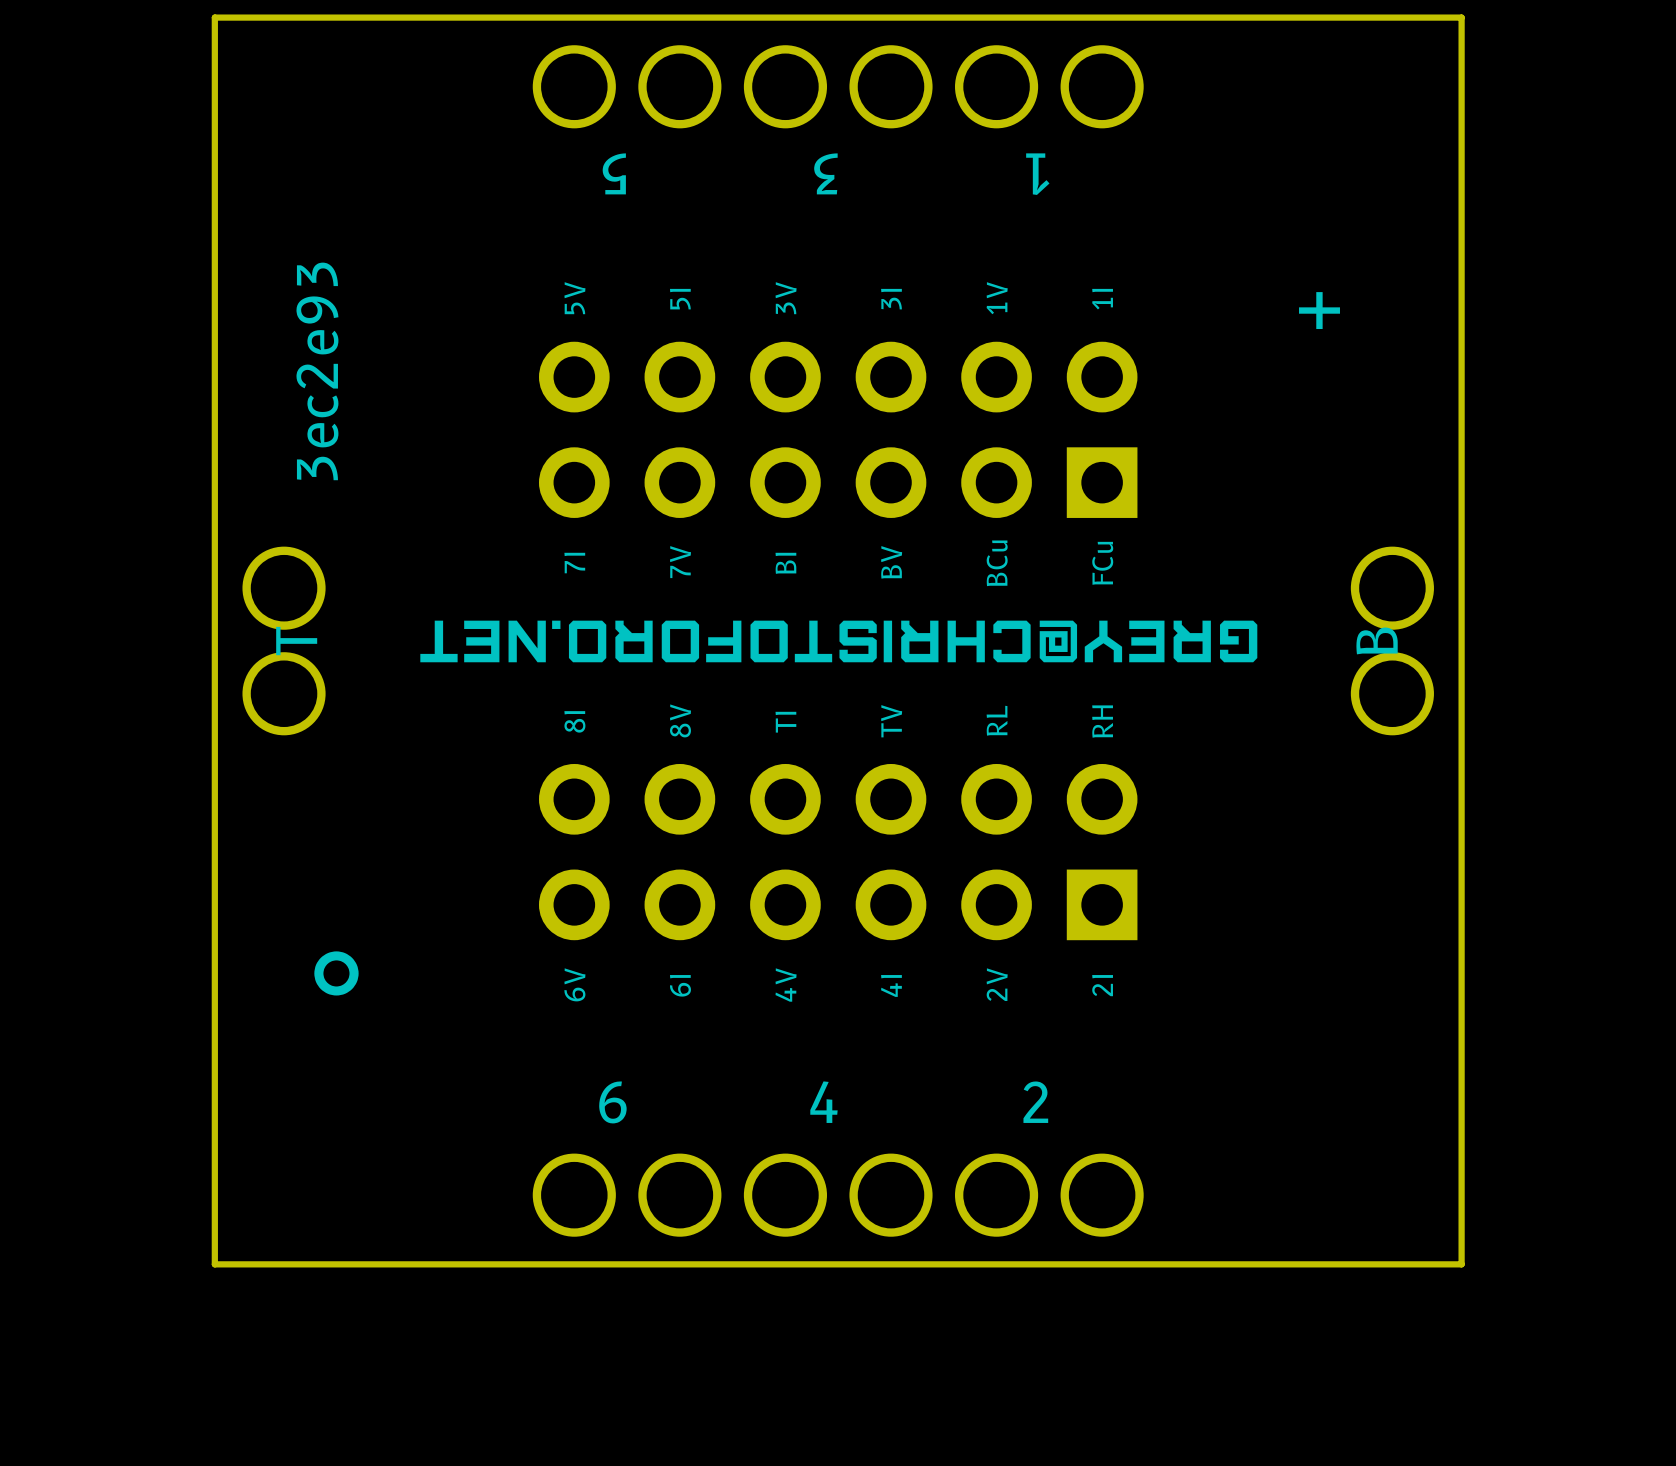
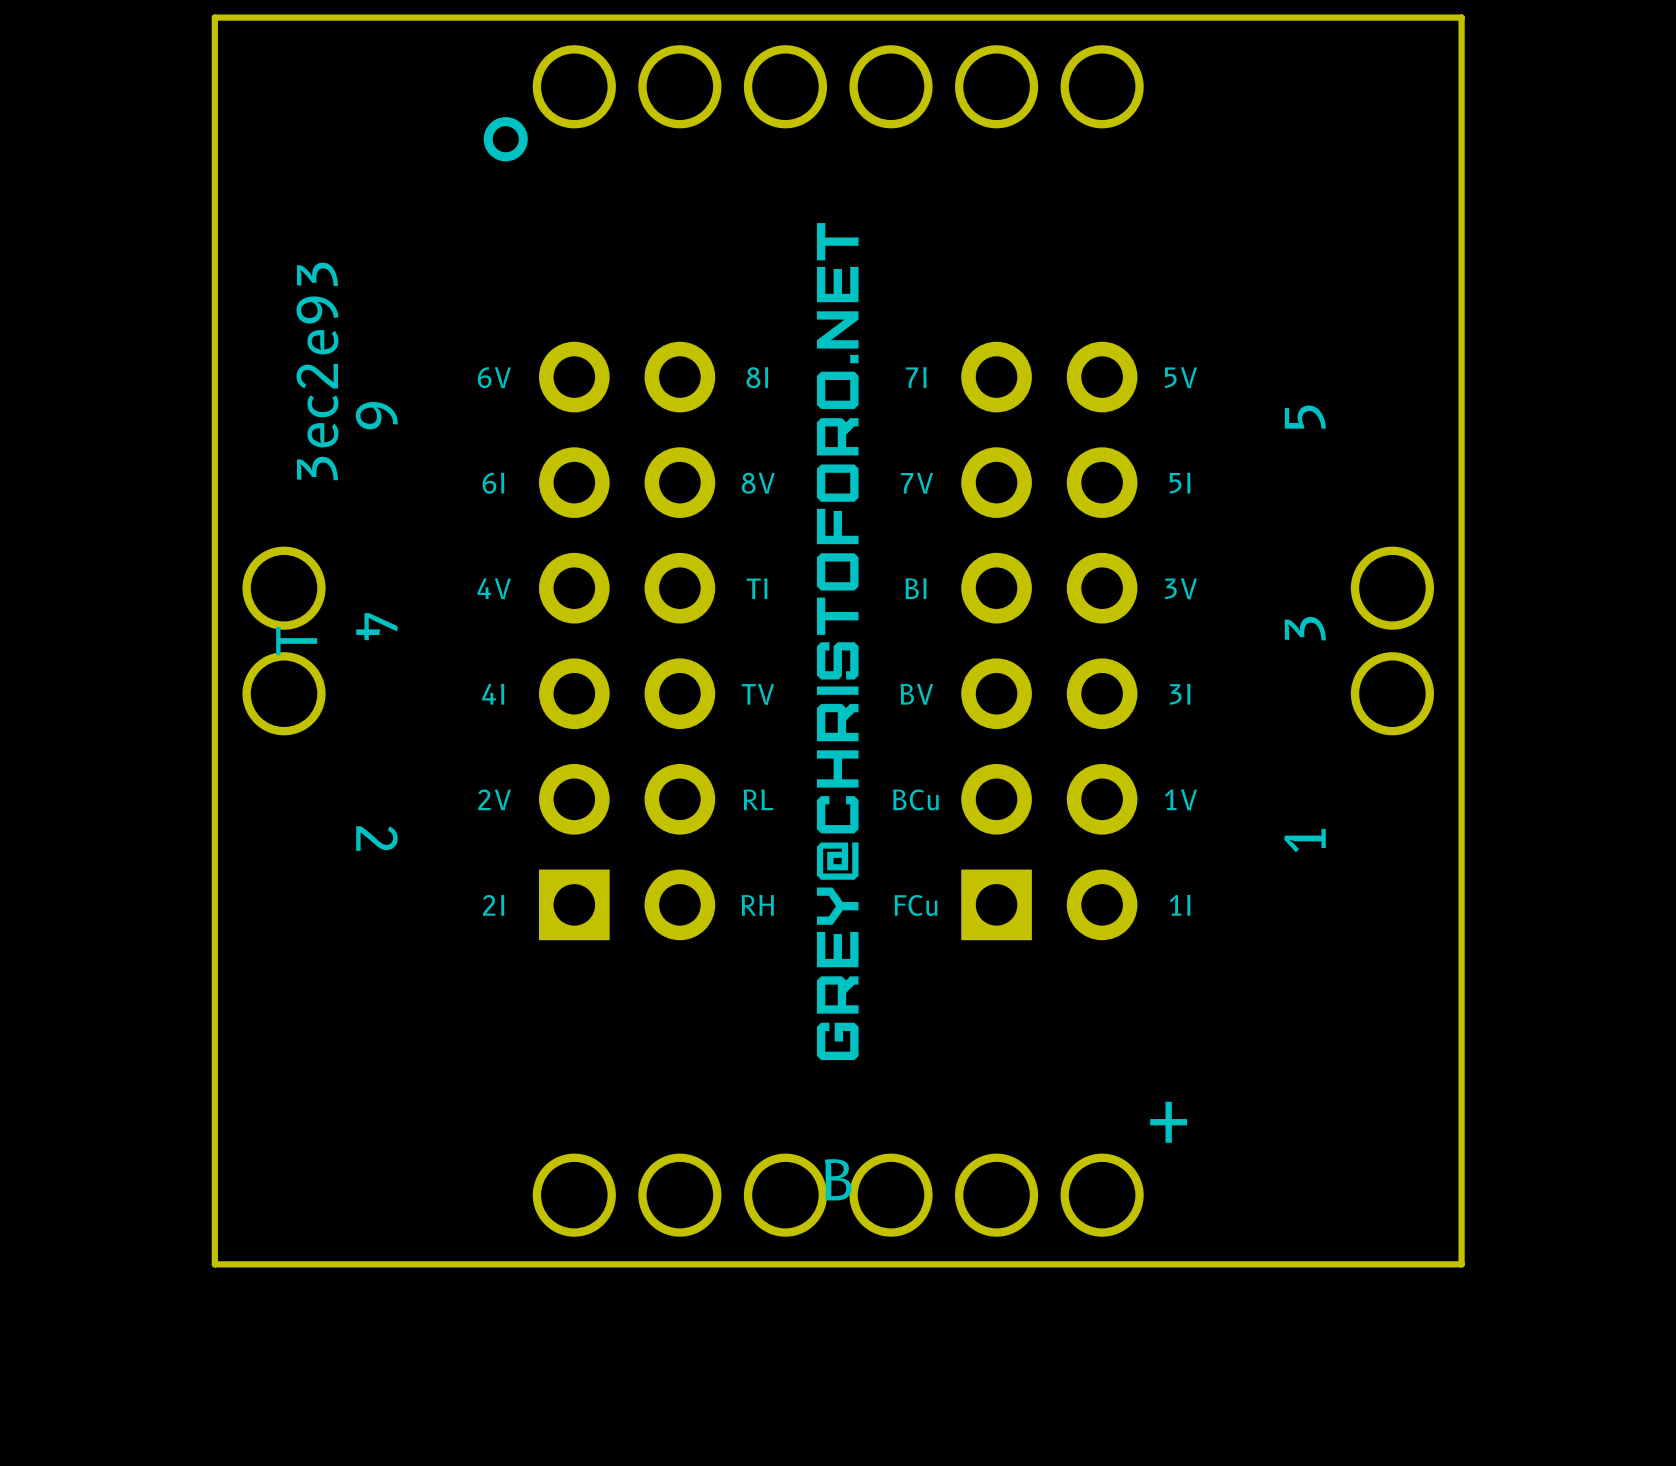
text rotation: 0° (614, 173) -> 90° clockwise (1305, 417)
text position: 5 (614, 173) -> 5 (1305, 417)
text rotation: 0° (825, 173) -> 90° clockwise (1305, 628)
text position: 3 (825, 173) -> 3 (1305, 628)
text rotation: 0° (1037, 174) -> 90° clockwise (1305, 840)
text position: 1 (1037, 174) -> 1 (1305, 840)
text rotation: 0° (574, 298) -> 90° clockwise (1181, 377)
text position: 5V (574, 298) -> 5V (1181, 377)
text rotation: 0° (786, 298) -> 90° clockwise (1181, 588)
text position: 3V (786, 298) -> 3V (1181, 588)
text rotation: 0° (997, 298) -> 90° clockwise (1180, 799)
text position: 1V (997, 298) -> 1V (1180, 799)
text rotation: 0° (680, 299) -> 90° clockwise (1180, 483)
text position: 5I (680, 299) -> 5I (1180, 483)
text rotation: 0° (891, 299) -> 90° clockwise (1180, 694)
text position: 3I (891, 299) -> 3I (1180, 694)
text rotation: 0° (1102, 299) -> 90° clockwise (1180, 905)
text position: 1I (1102, 299) -> 1I (1180, 905)
text rotation: 0° (1319, 310) -> 90° clockwise (1168, 1122)
text position: + (1319, 310) -> + (1168, 1122)
part: (838, 429) -> none
text rotation: 0° (680, 562) -> 90° clockwise (917, 483)
text position: 7V (680, 562) -> 7V (917, 483)
text rotation: 0° (891, 562) -> 90° clockwise (916, 694)
text position: BV (891, 562) -> BV (916, 694)
text rotation: 0° (574, 563) -> 90° clockwise (916, 377)
text position: 7I (574, 563) -> 7I (916, 377)
text rotation: 0° (785, 563) -> 90° clockwise (915, 588)
text position: BI (785, 563) -> BI (915, 588)
text rotation: 0° (997, 563) -> 90° clockwise (915, 799)
text position: BCu (997, 563) -> BCu (915, 799)
text rotation: 0° (1102, 563) -> 90° clockwise (915, 905)
text position: FCu (1102, 563) -> FCu (915, 905)
drawing shape: [420, 620, 1258, 663] -> [816, 223, 859, 1061]
part: none -> (627, 640)
part: none -> (1049, 640)
text rotation: 0° (1377, 640) -> 90° clockwise (838, 1179)
text position: B (1377, 640) -> B (838, 1179)
text rotation: 0° (680, 720) -> 90° clockwise (758, 483)
text position: 8V (680, 720) -> 8V (758, 483)
text rotation: 0° (997, 720) -> 90° clockwise (758, 799)
text position: RL (997, 720) -> RL (758, 799)
text rotation: 0° (574, 721) -> 90° clockwise (757, 377)
text position: 8I (574, 721) -> 8I (757, 377)
text rotation: 0° (891, 721) -> 90° clockwise (757, 694)
text position: TV (891, 721) -> TV (757, 694)
text rotation: 0° (1102, 721) -> 90° clockwise (757, 905)
text position: RH (1102, 721) -> RH (757, 905)
text rotation: 0° (785, 722) -> 90° clockwise (756, 588)
text position: TI (785, 722) -> TI (756, 588)
part: (838, 852) -> none
text rotation: 0° (336, 973) -> 90° clockwise (505, 139)
text position: ° (336, 973) -> ° (505, 139)
text rotation: 0° (574, 984) -> 90° clockwise (494, 377)
text position: 6V (574, 984) -> 6V (494, 377)
text rotation: 0° (997, 984) -> 90° clockwise (494, 799)
text position: 2V (997, 984) -> 2V (494, 799)
text rotation: 0° (680, 985) -> 90° clockwise (493, 483)
text position: 6I (680, 985) -> 6I (493, 483)
text rotation: 0° (786, 985) -> 90° clockwise (494, 588)
text position: 4V (786, 985) -> 4V (494, 588)
text rotation: 0° (891, 985) -> 90° clockwise (493, 694)
text position: 4I (891, 985) -> 4I (493, 694)
text rotation: 0° (1102, 985) -> 90° clockwise (493, 905)
text position: 2I (1102, 985) -> 2I (493, 905)
text rotation: 0° (612, 1102) -> 90° clockwise (376, 415)
text position: 6 (612, 1102) -> 6 (376, 415)
text rotation: 0° (823, 1102) -> 90° clockwise (377, 626)
text position: 4 (823, 1102) -> 4 (377, 626)
text rotation: 0° (1035, 1102) -> 90° clockwise (376, 838)
text position: 2 (1035, 1102) -> 2 (376, 838)

